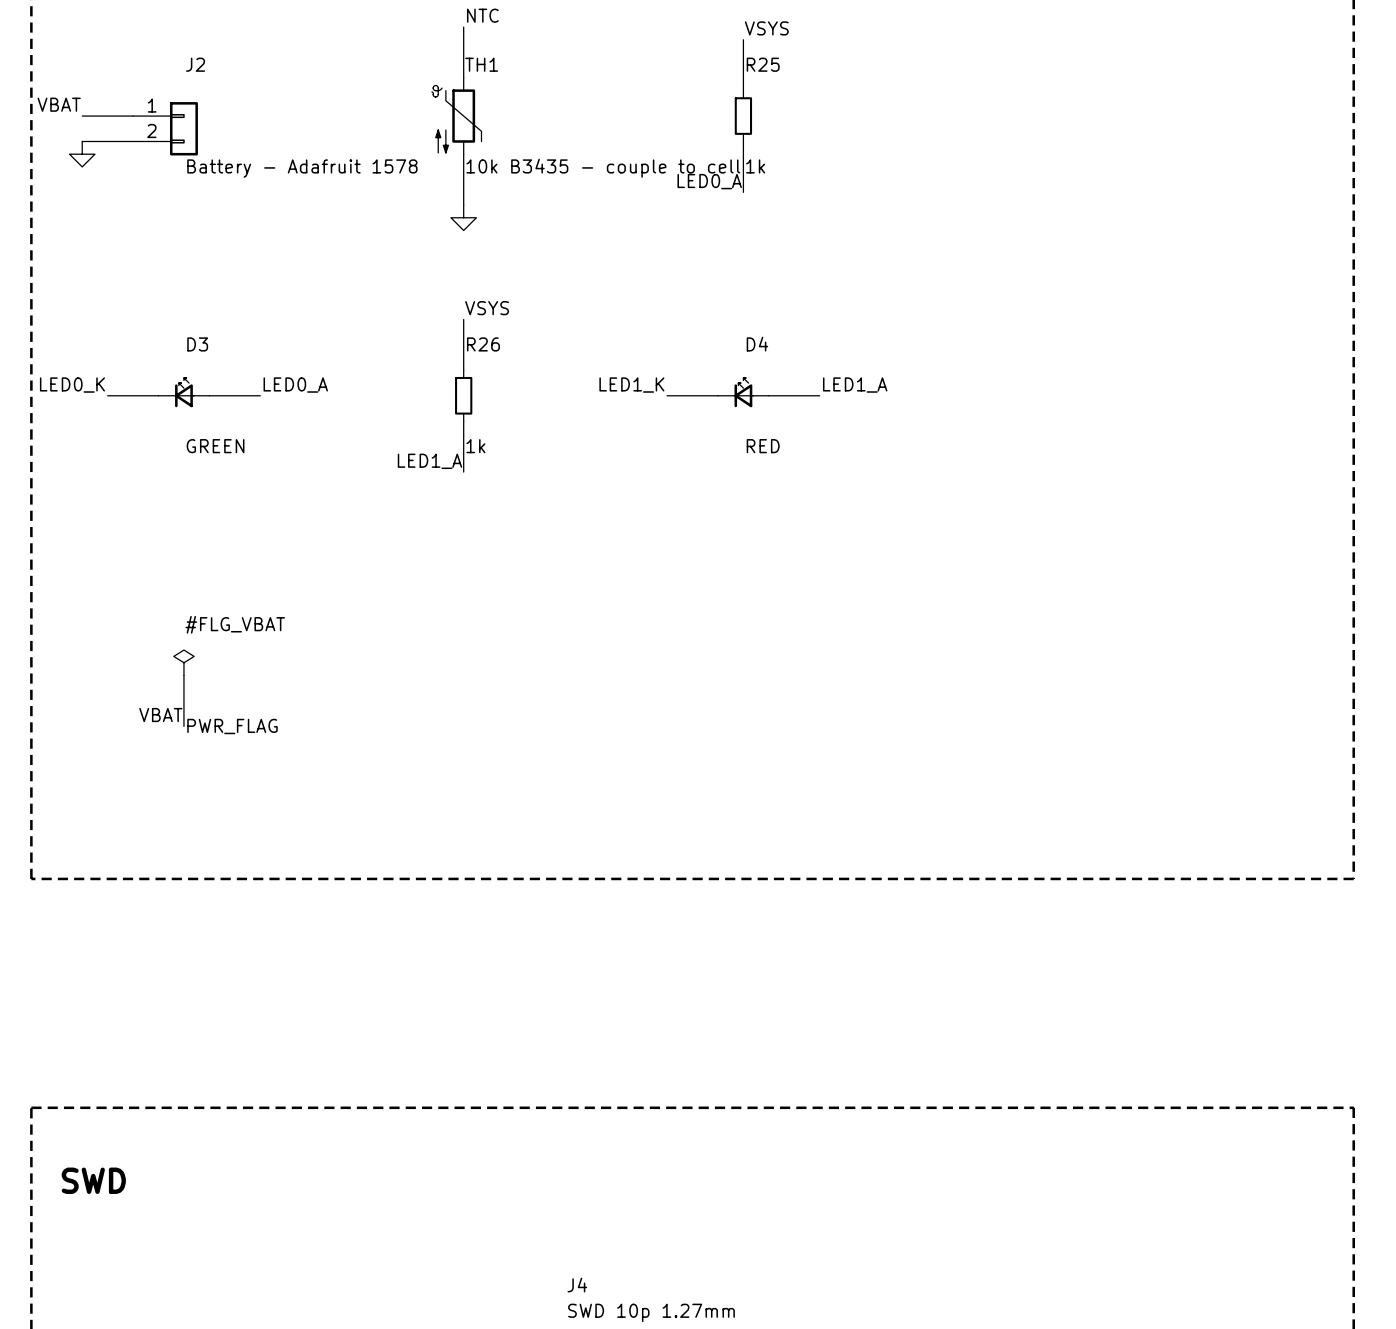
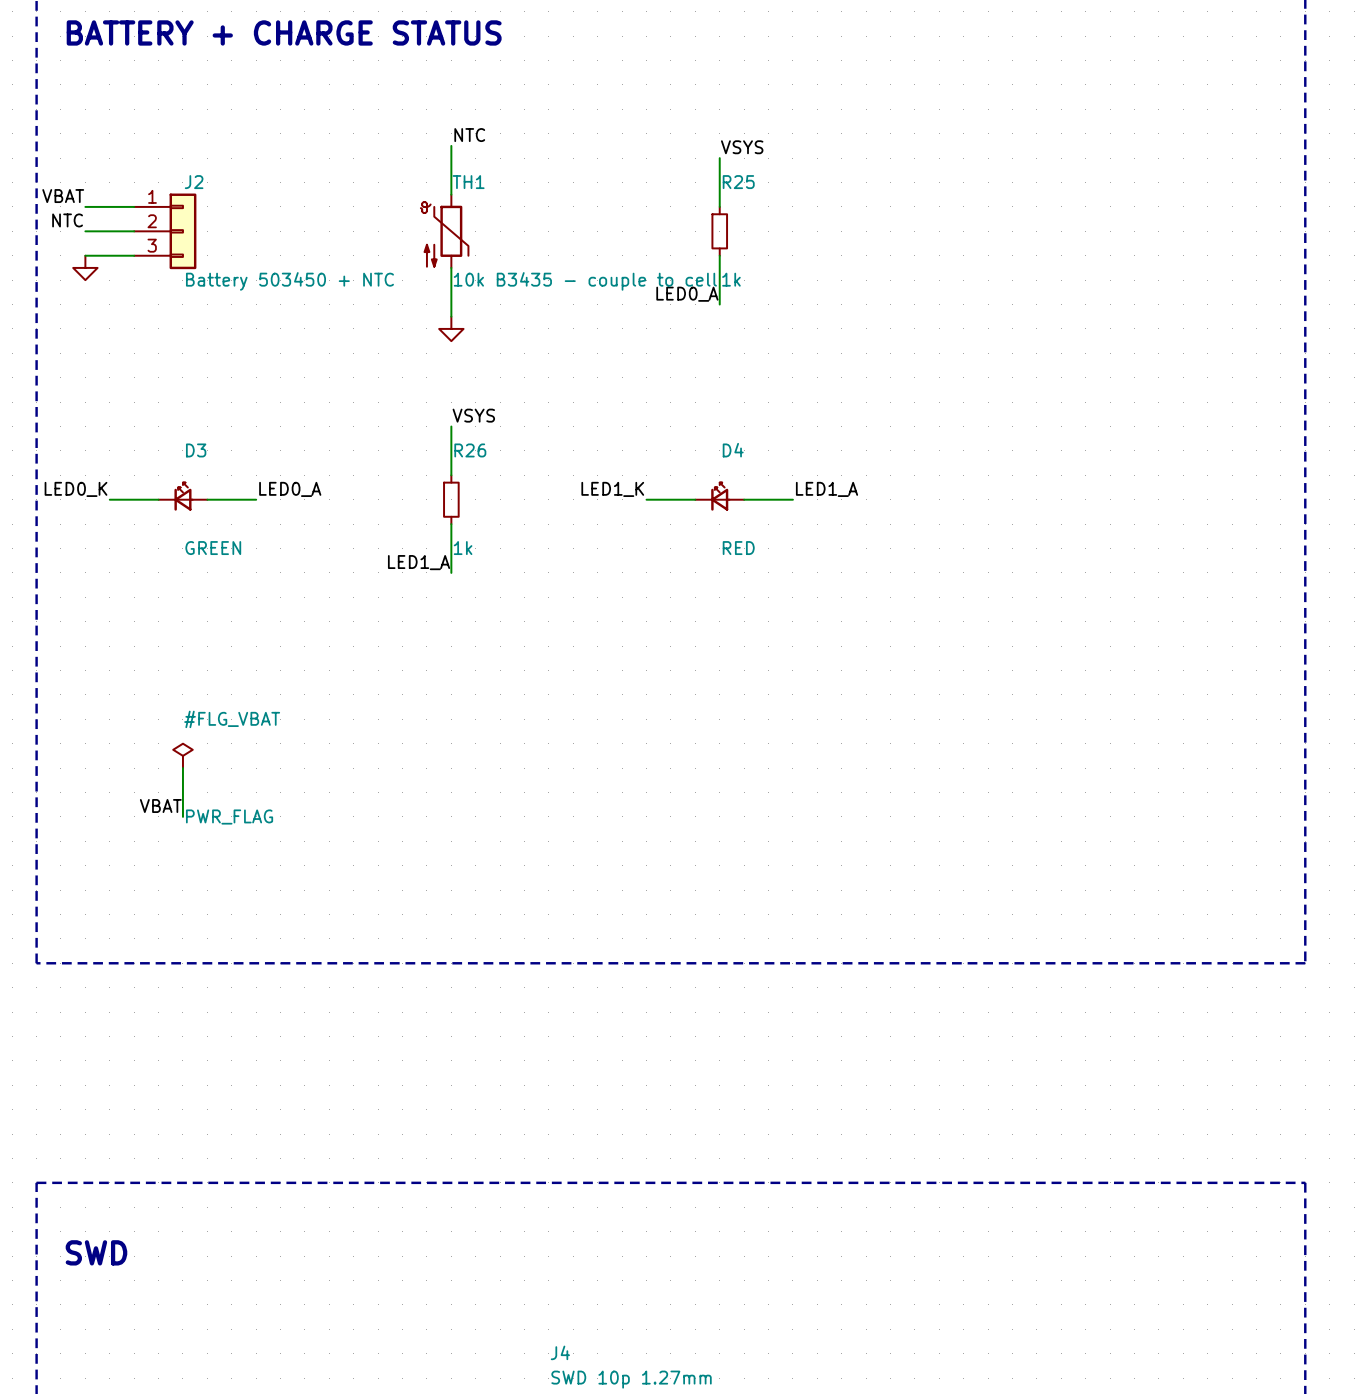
label: none -> VBAT (63, 196)
wire: none -> (85, 206) (134, 206)
J2 symbol: [133, 102, 198, 156] -> [134, 193, 197, 270]
label: VBAT (59, 104) -> NTC (67, 220)
J2 value: Battery - Adafruit 1578 (302, 168) -> Battery 503450 + NTC (289, 281)

